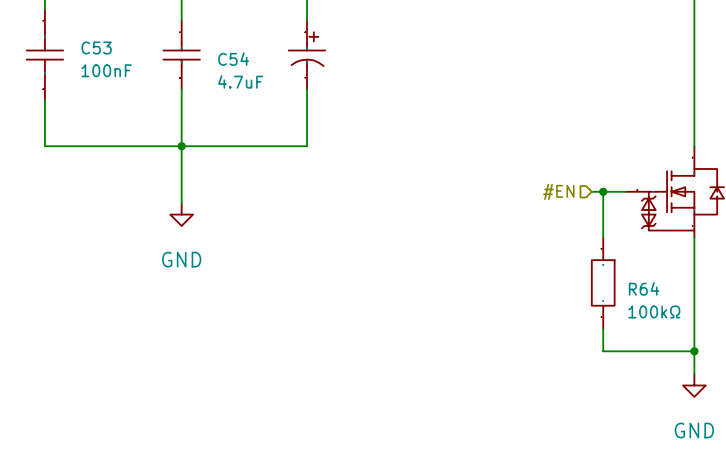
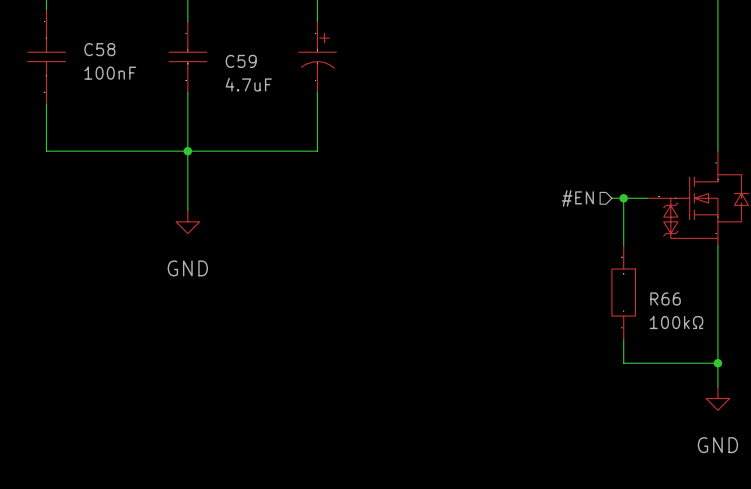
C53 name: C53 (96, 47) -> C58 (99, 49)
C54 name: C54 (233, 59) -> C59 (241, 61)
R64 name: R64 (644, 288) -> R66 (665, 298)

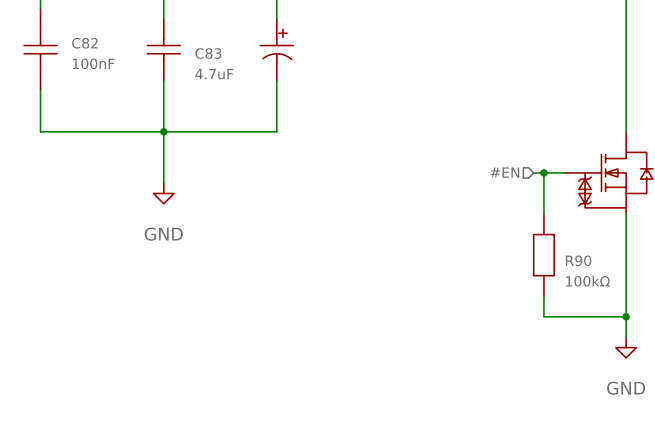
C58 name: C58 (99, 49) -> C82 (84, 43)
C59 name: C59 (241, 61) -> C83 (208, 53)
R66 name: R66 (665, 298) -> R90 (578, 260)

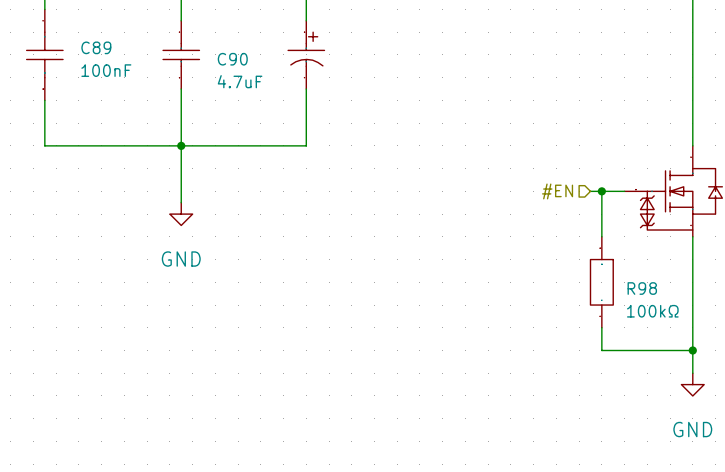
C82 name: C82 (84, 43) -> C89 (96, 47)
C83 name: C83 (208, 53) -> C90 (232, 59)
R90 name: R90 (578, 260) -> R98 (642, 288)

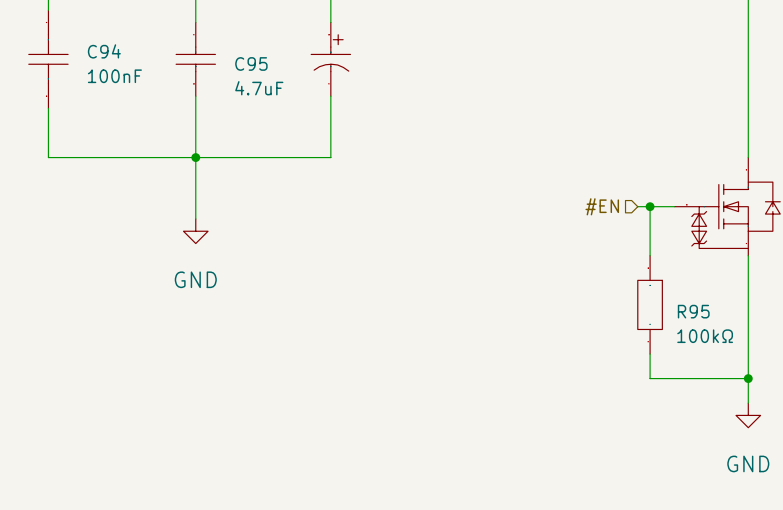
C89 name: C89 (96, 47) -> C94 (104, 51)
C90 name: C90 (232, 59) -> C95 (251, 63)
R98 name: R98 (642, 288) -> R95 (693, 311)

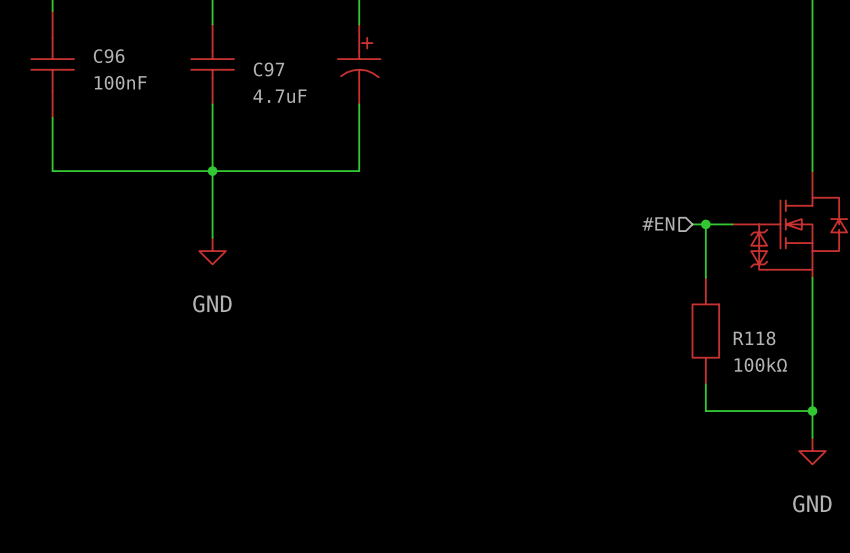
C94 name: C94 (104, 51) -> C96 (109, 56)
C95 name: C95 (251, 63) -> C97 (269, 69)
R95 name: R95 (693, 311) -> R118 (754, 338)

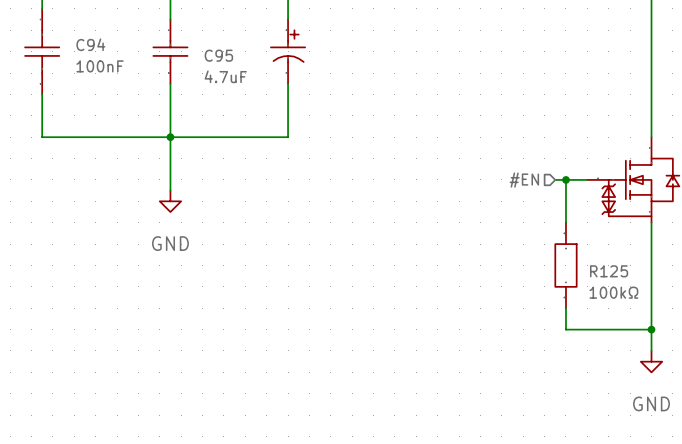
C96 name: C96 (109, 56) -> C94 (90, 44)
C97 name: C97 (269, 69) -> C95 (218, 55)
R118 name: R118 (754, 338) -> R125 (609, 271)

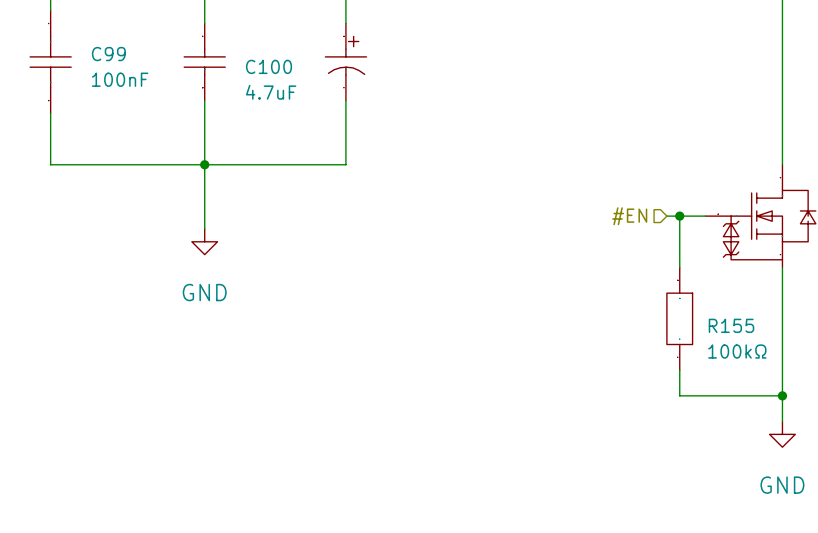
C94 name: C94 (90, 44) -> C99 (108, 54)
C95 name: C95 (218, 55) -> C100 (269, 66)
R125 name: R125 (609, 271) -> R155 (731, 325)

